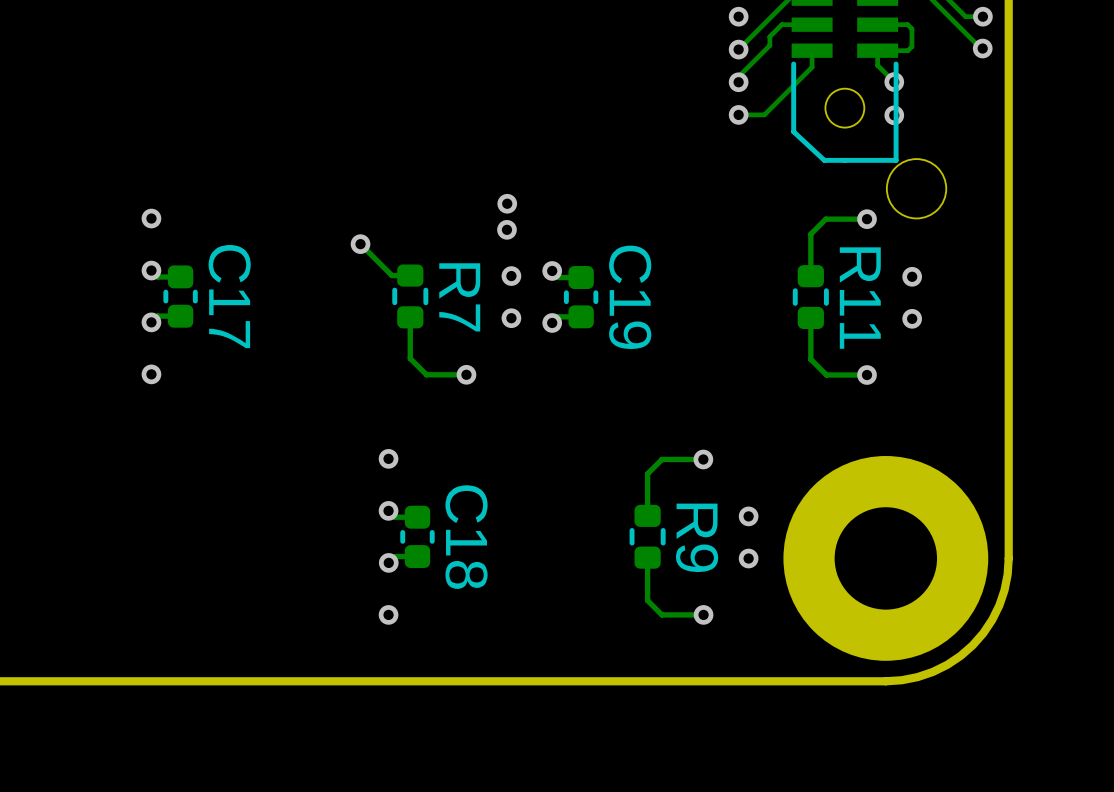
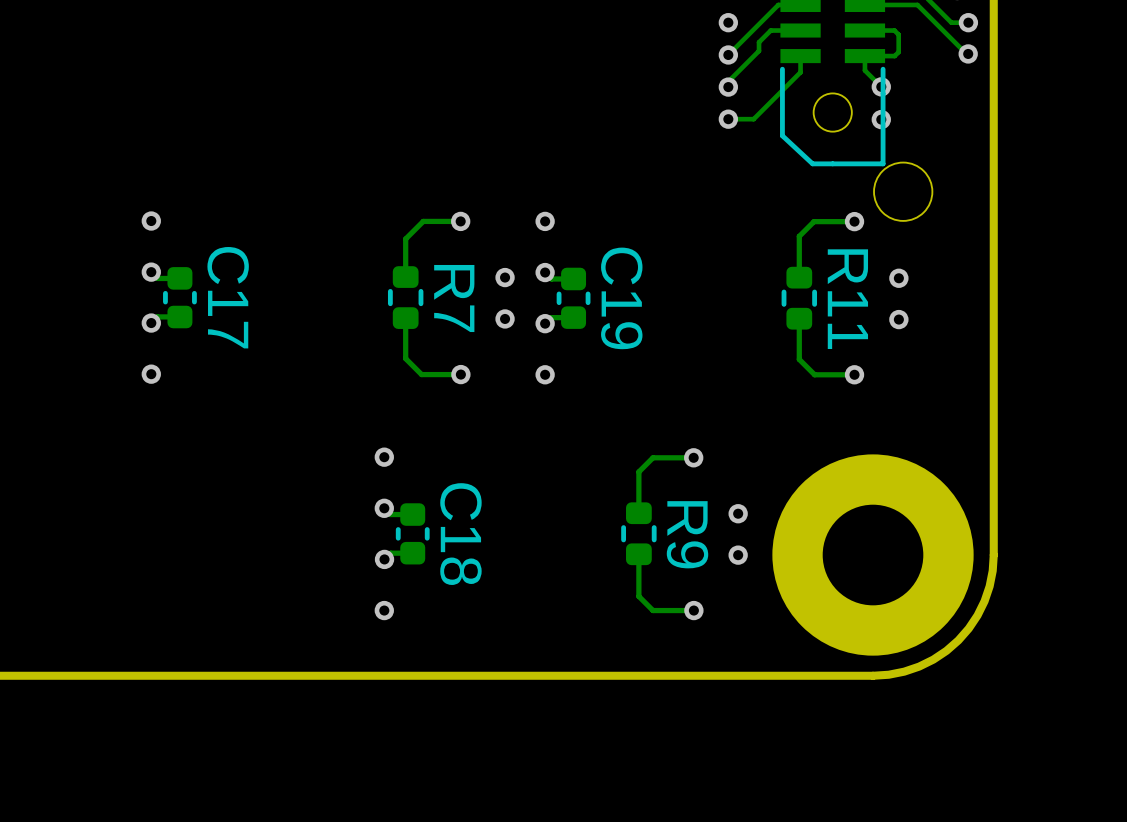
via: (507, 203) -> none
via: none -> (460, 221)
via: none -> (545, 221)
via: (506, 229) -> none
track: (360, 244) (391, 275) (410, 275) -> (460, 221) (423, 221) (405, 239) (405, 277)
via: (360, 244) -> none
via: none -> (545, 374)

